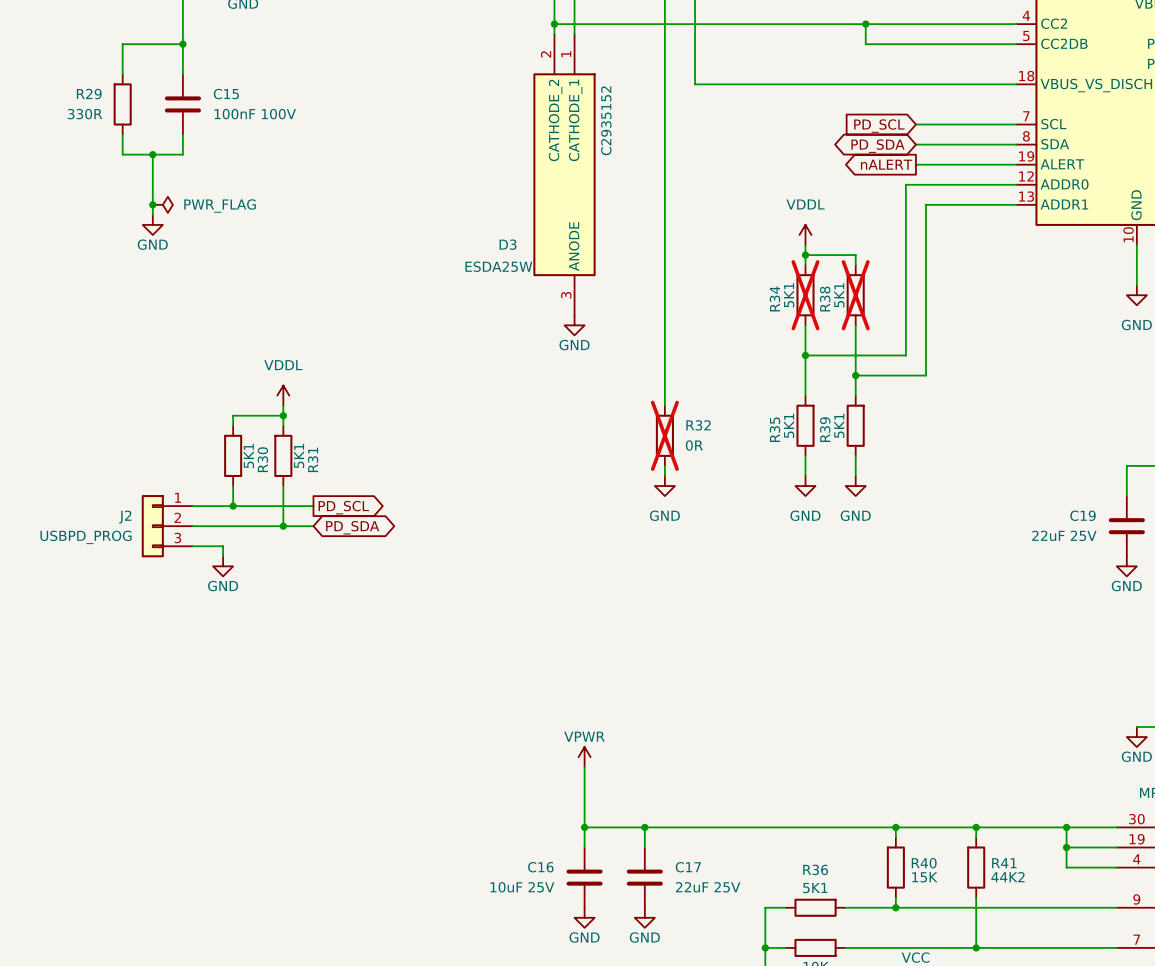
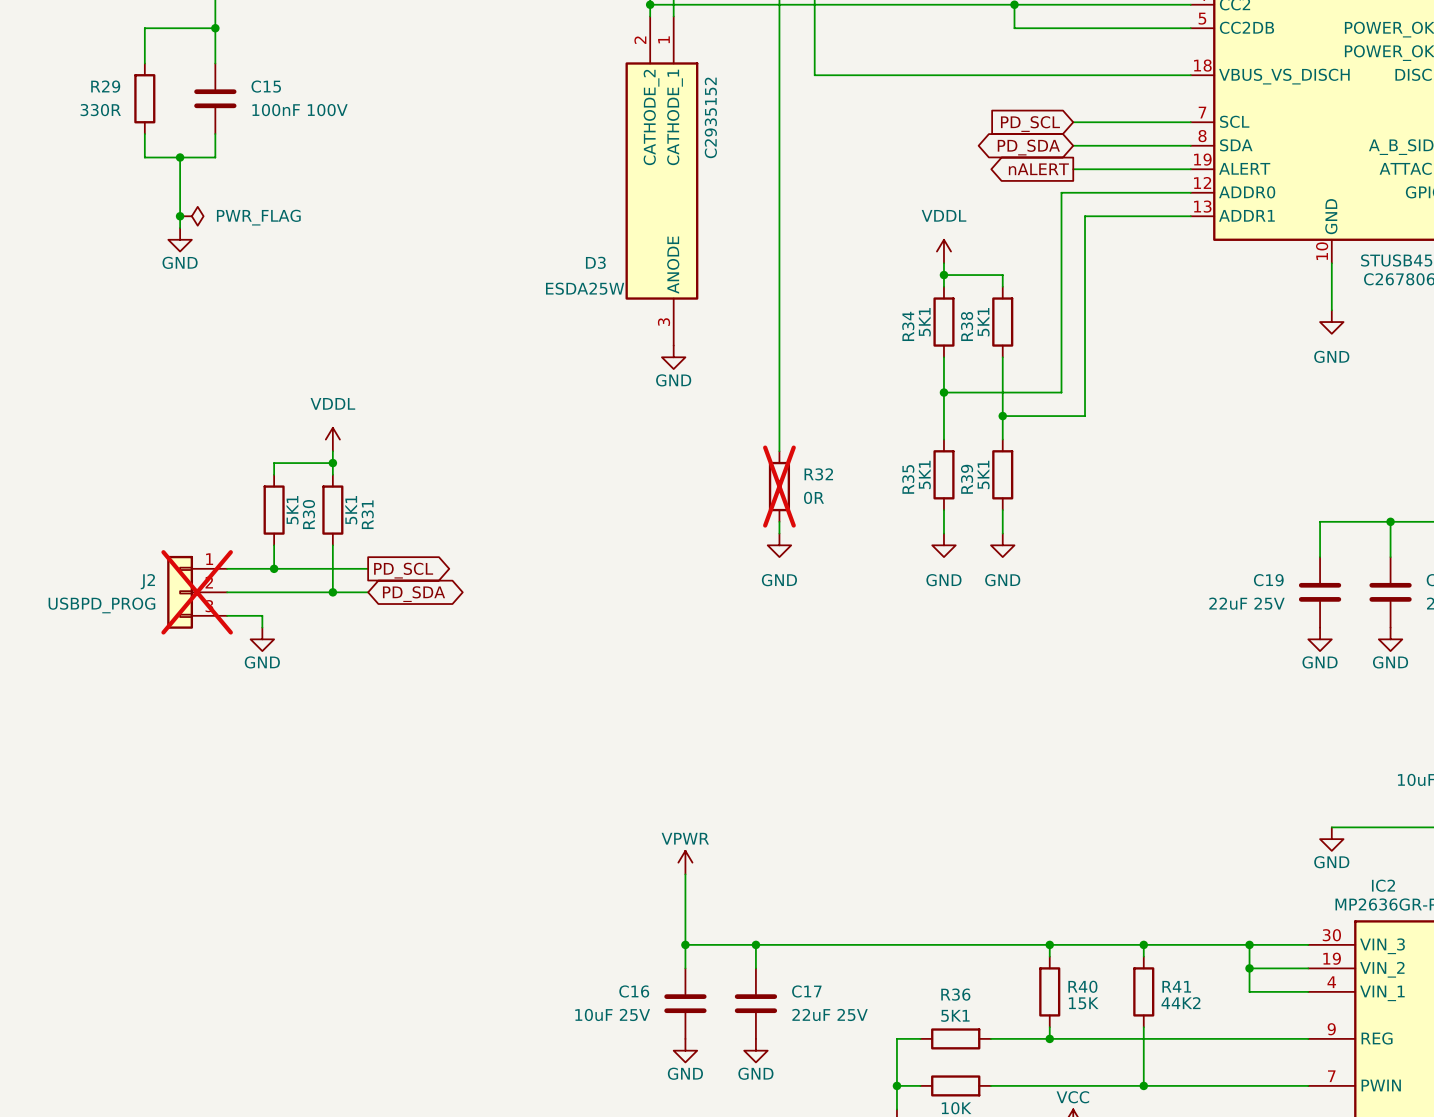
R34 do-not-place cross: (805, 295) -> none
R38 do-not-place cross: (855, 295) -> none
J2 do-not-place cross: none -> (197, 592)

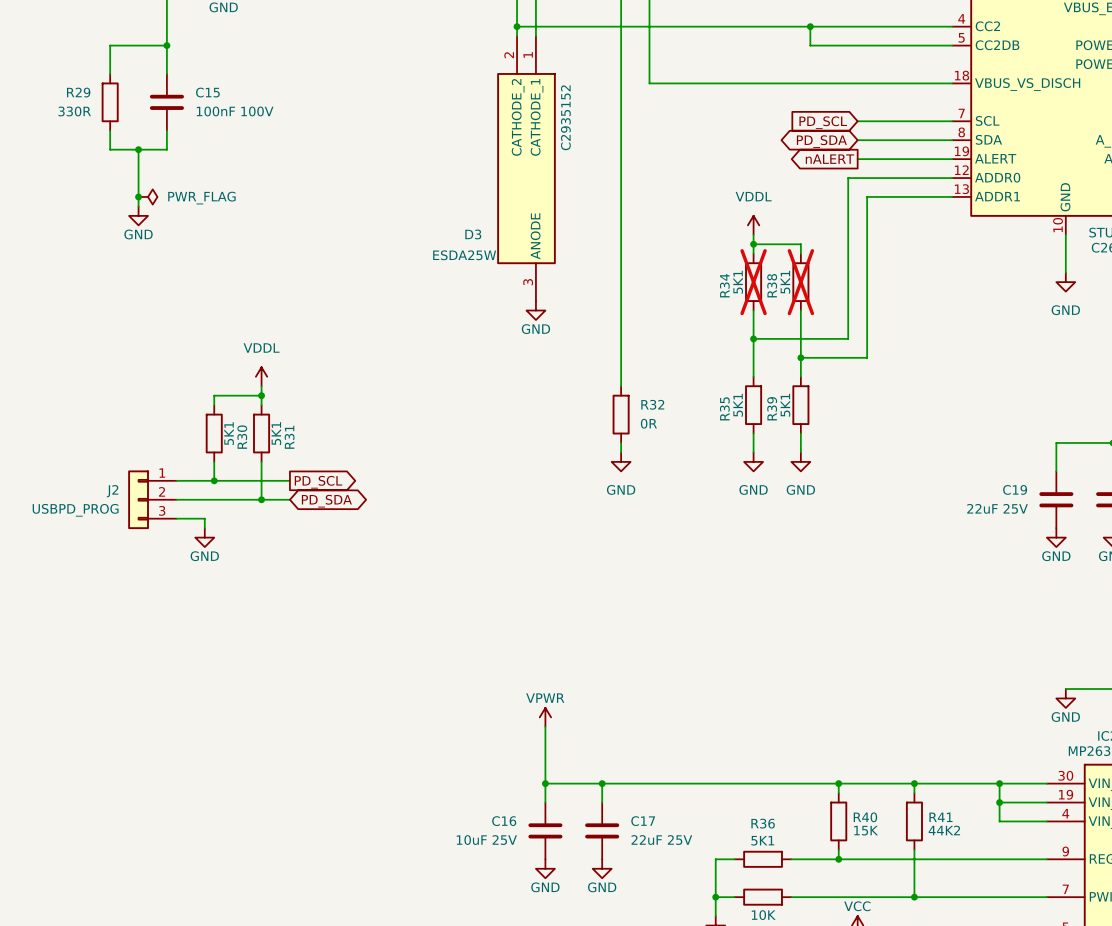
R34 do-not-place cross: none -> (753, 282)
R38 do-not-place cross: none -> (800, 282)
R32 do-not-place cross: (779, 486) -> none
J2 do-not-place cross: (197, 592) -> none

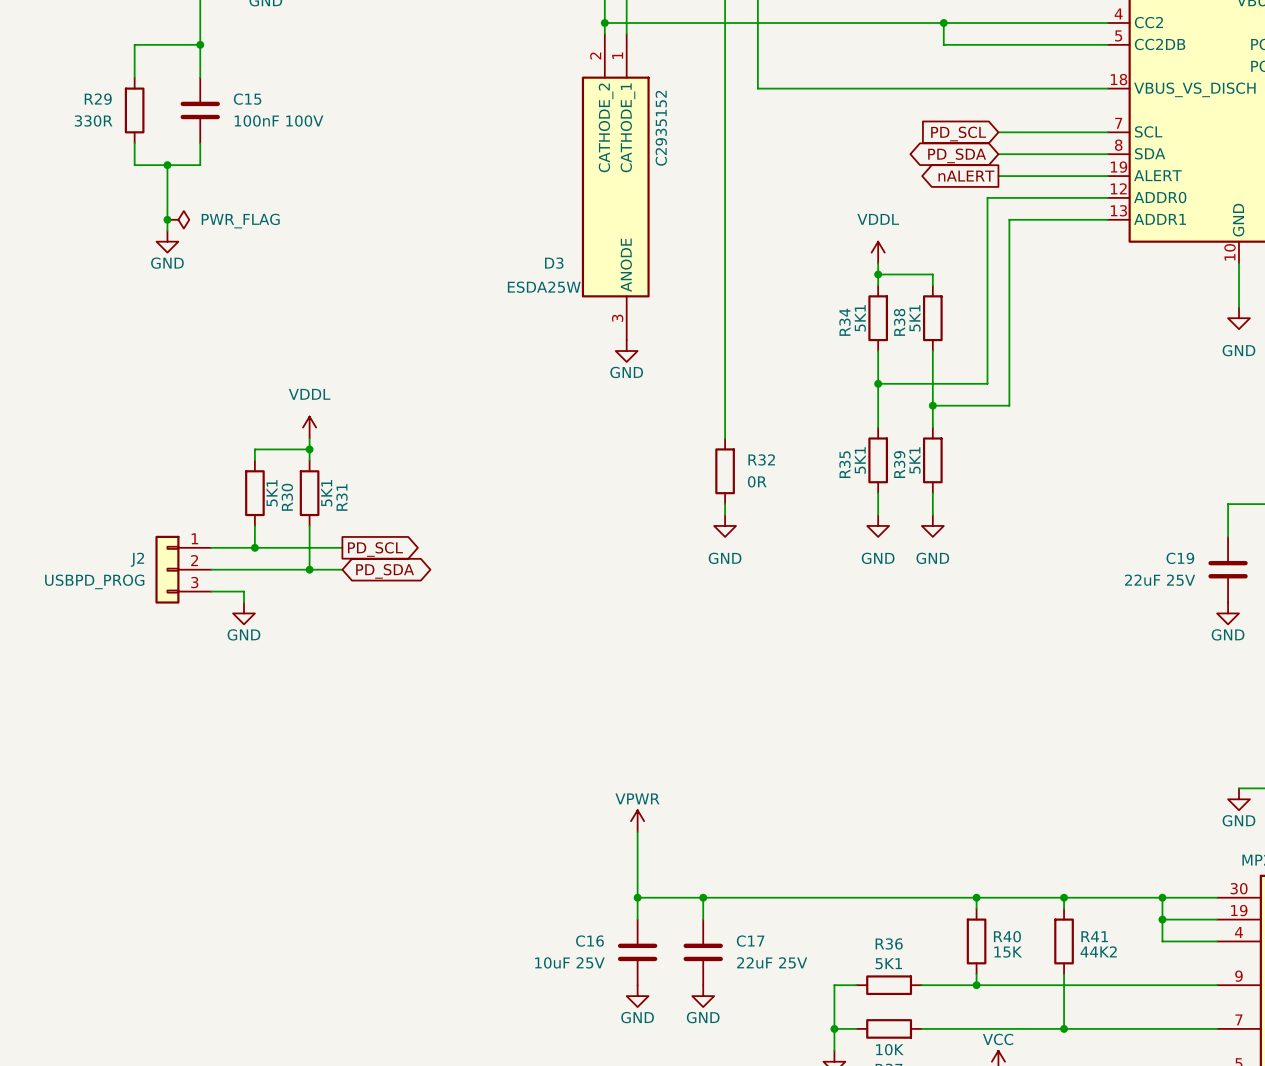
R34 do-not-place cross: (753, 282) -> none
R38 do-not-place cross: (800, 282) -> none

